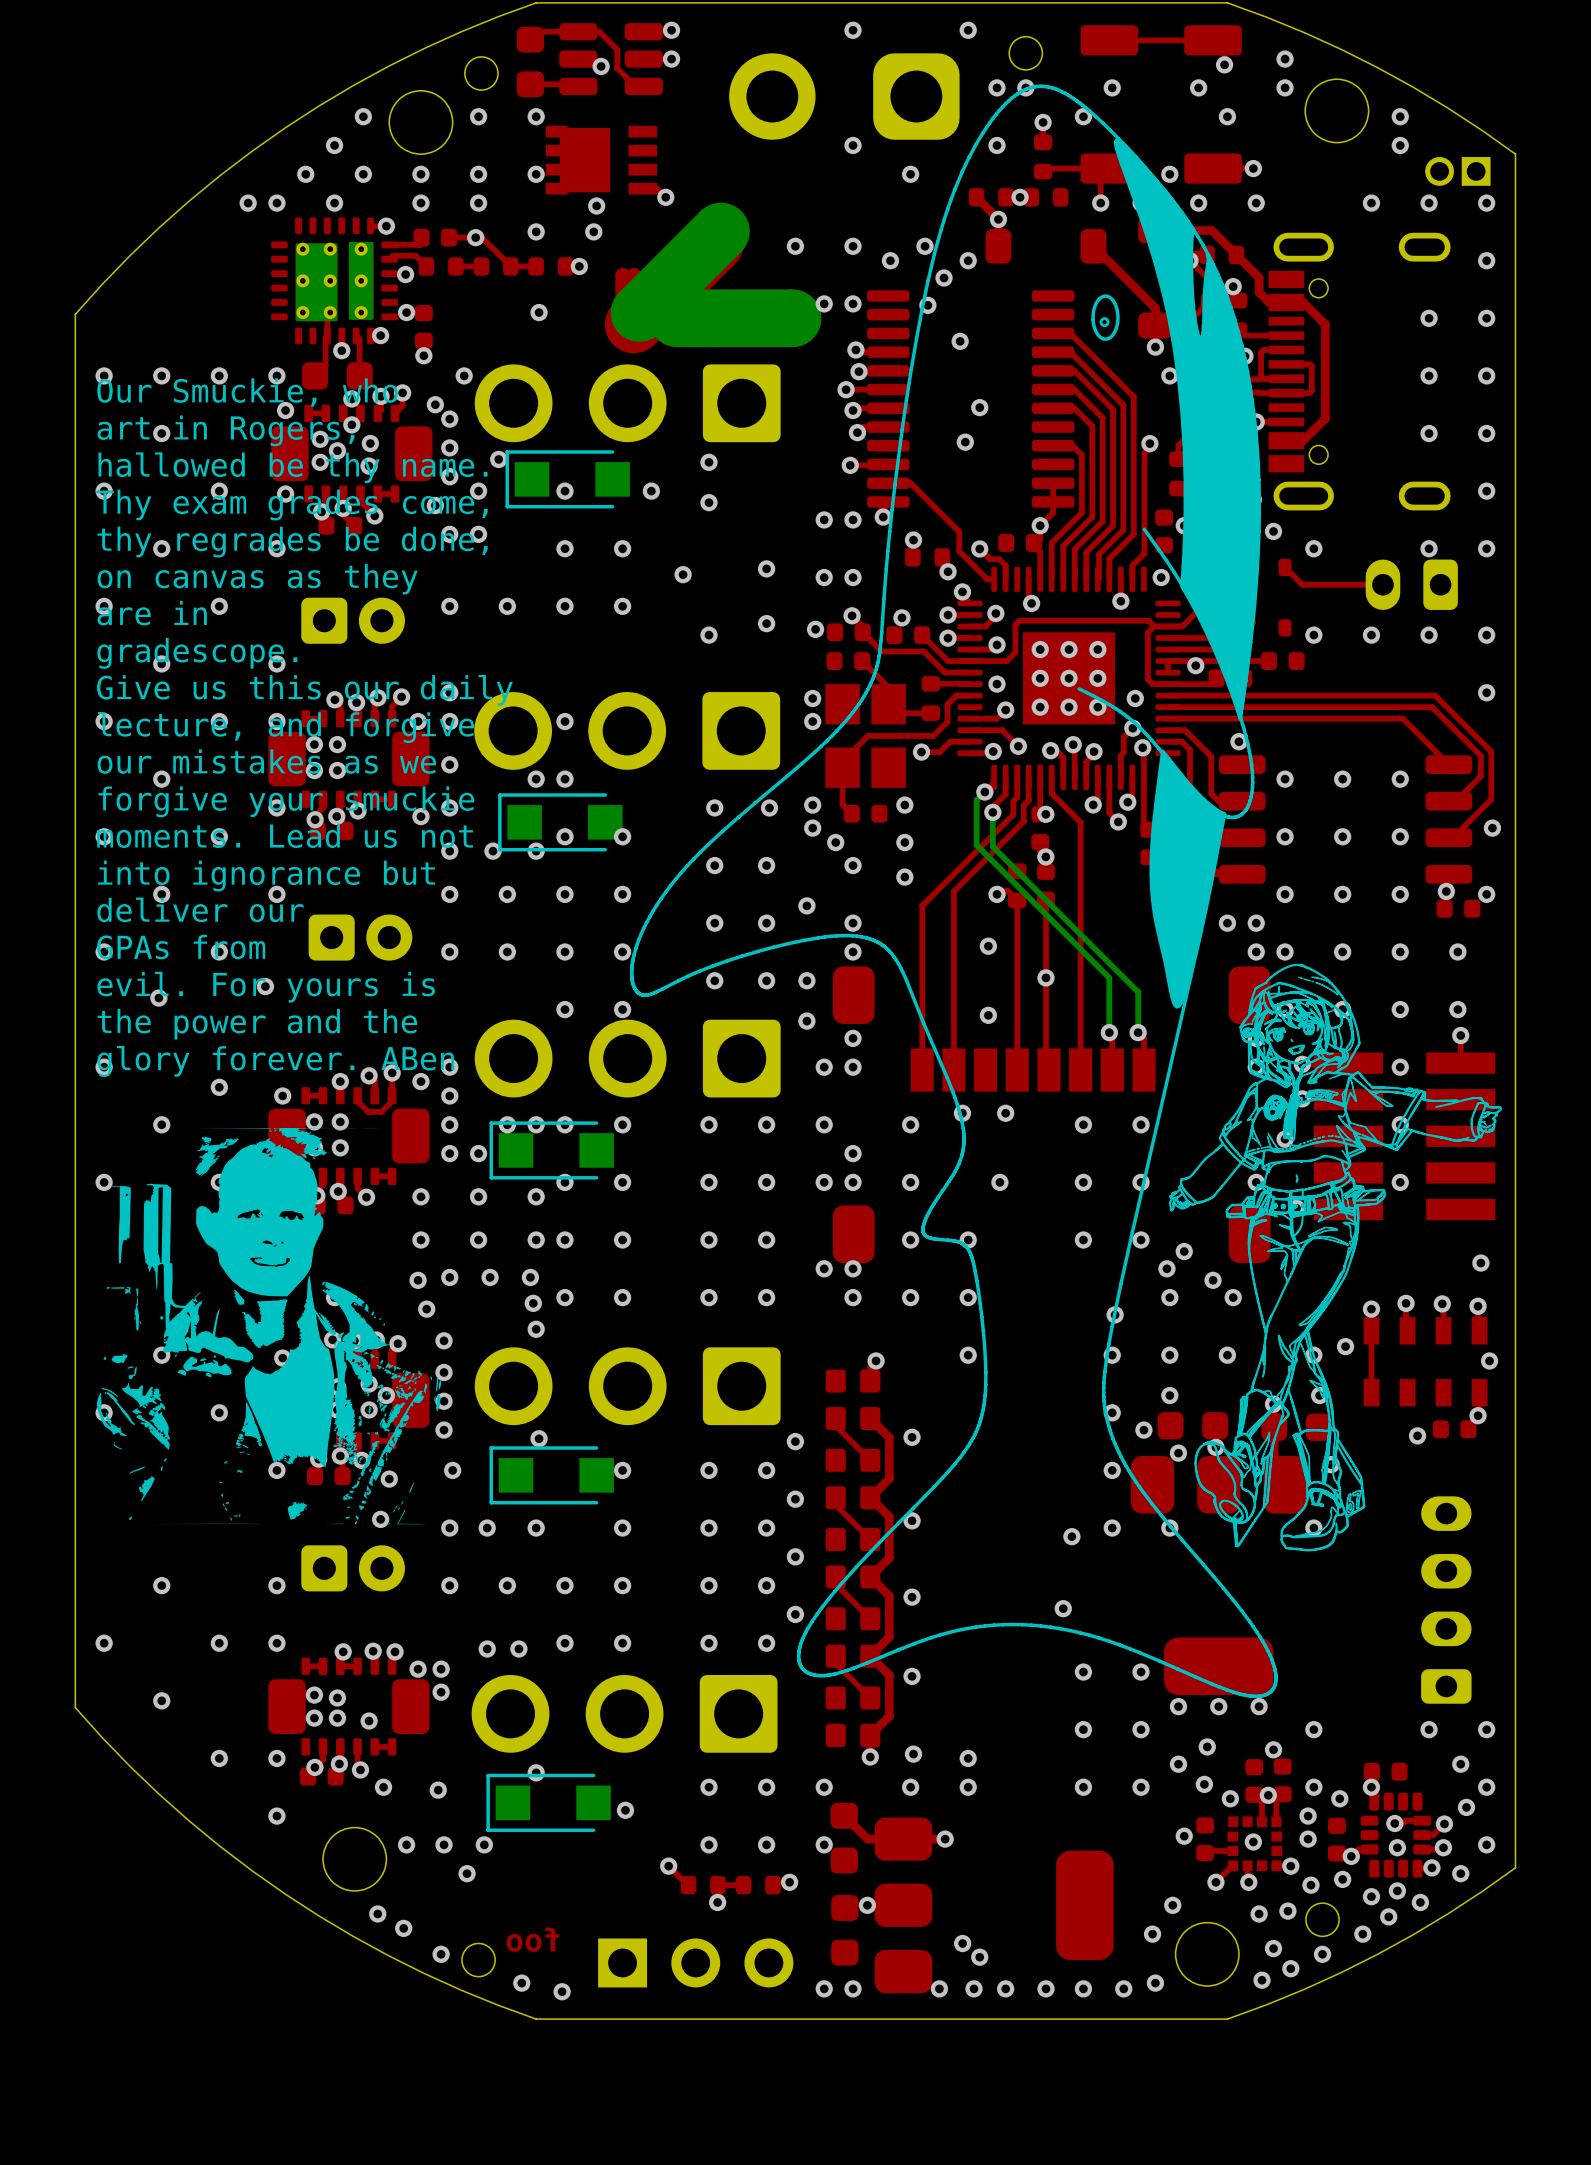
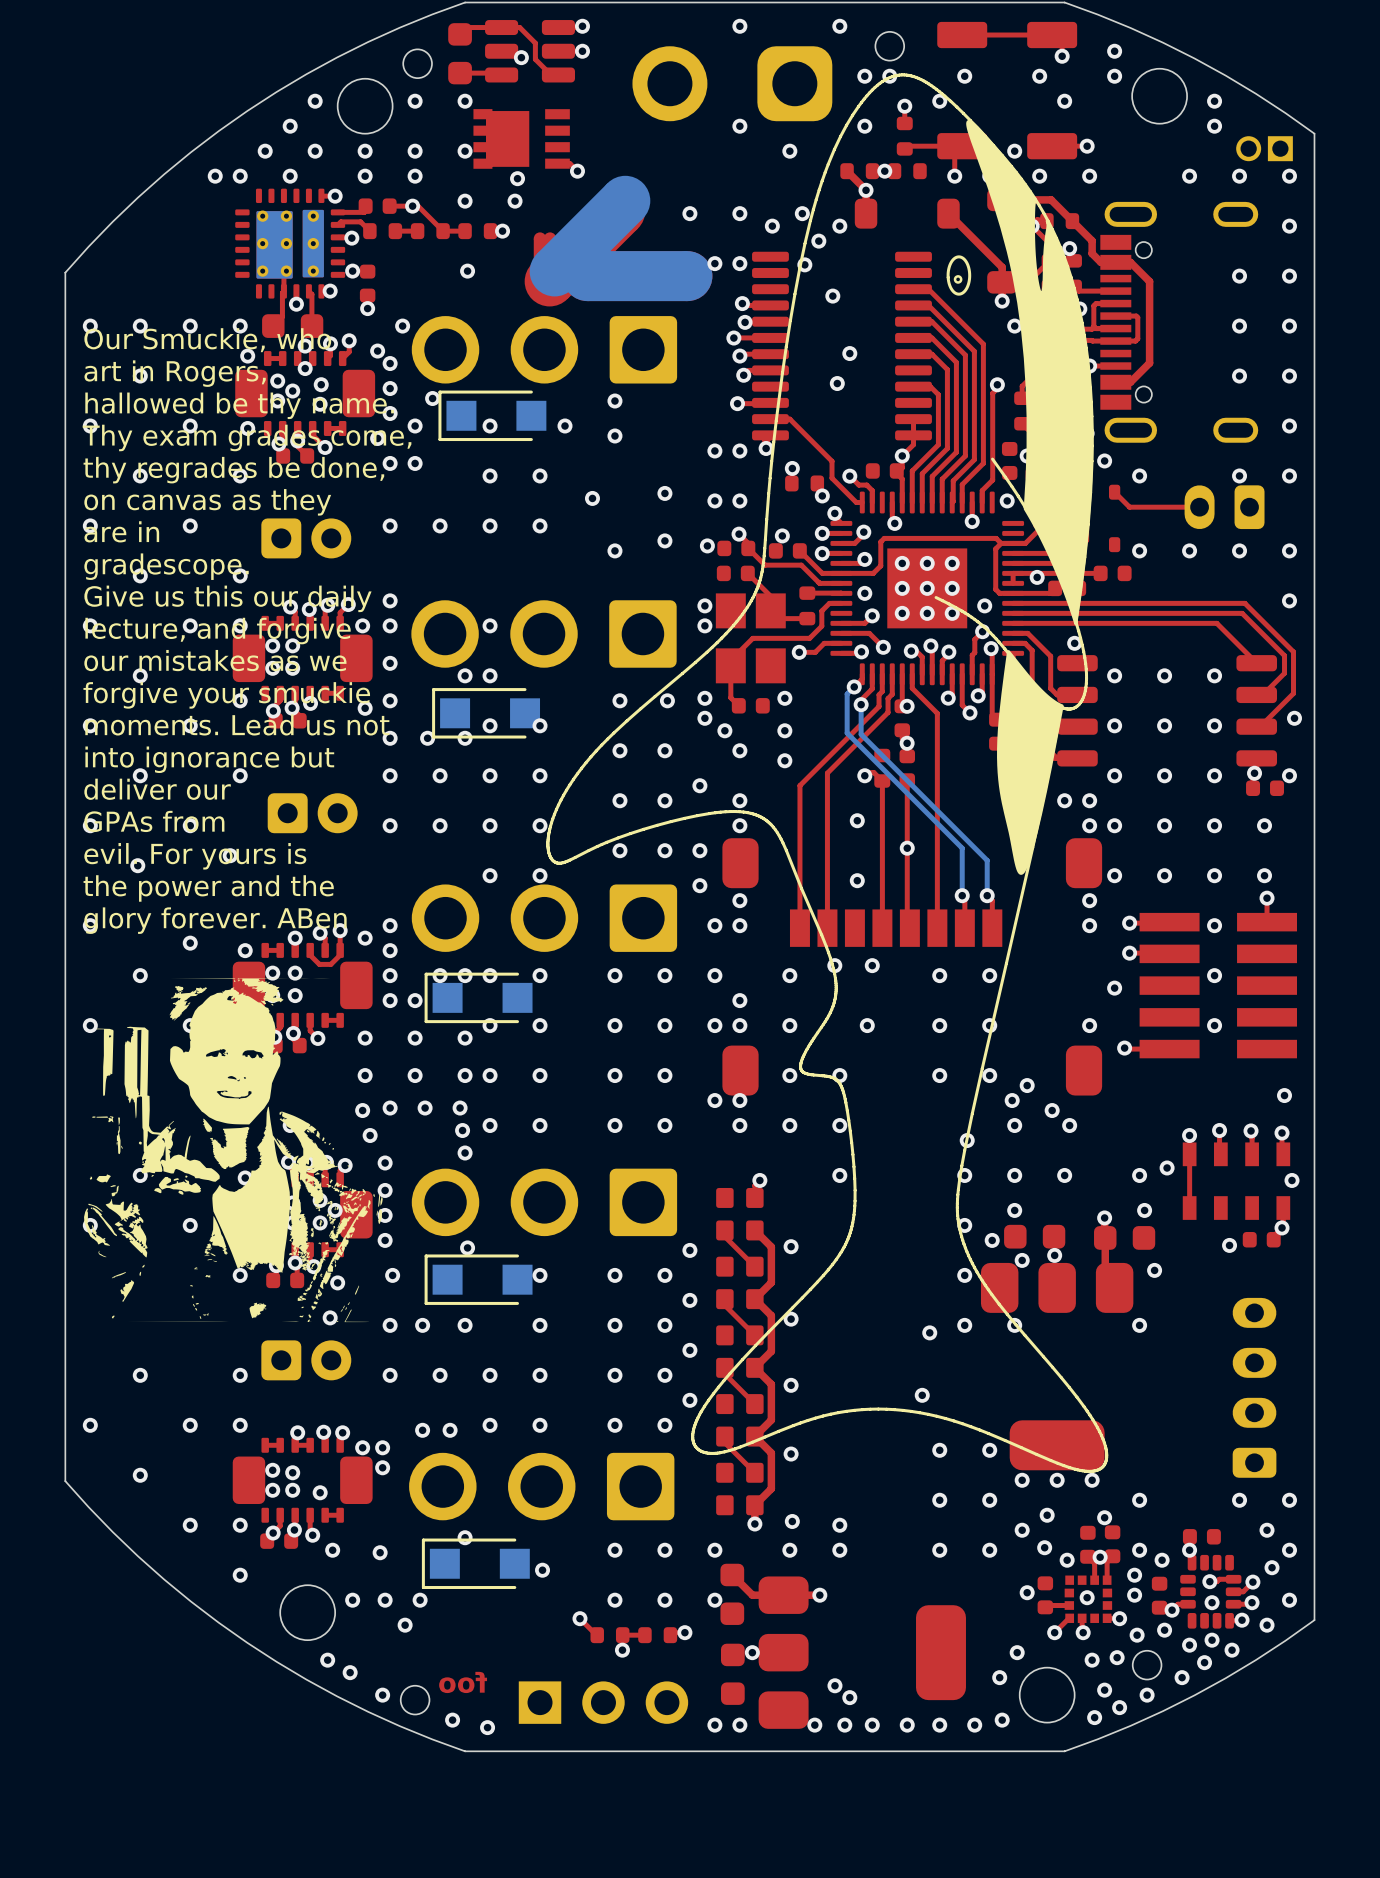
drawing: [1169, 963, 1502, 1552] -> none

